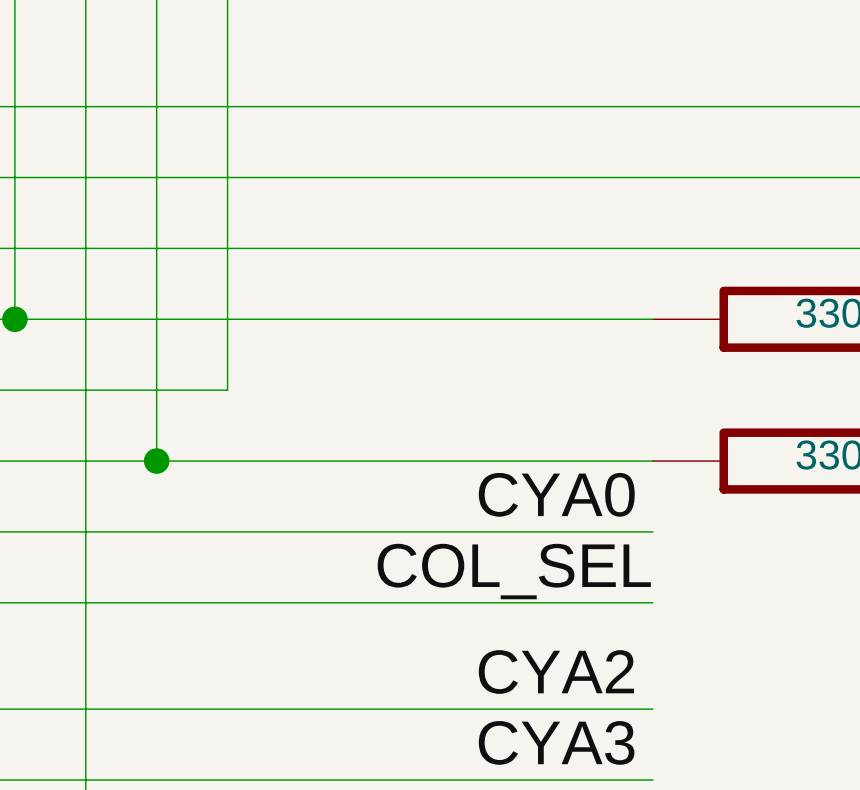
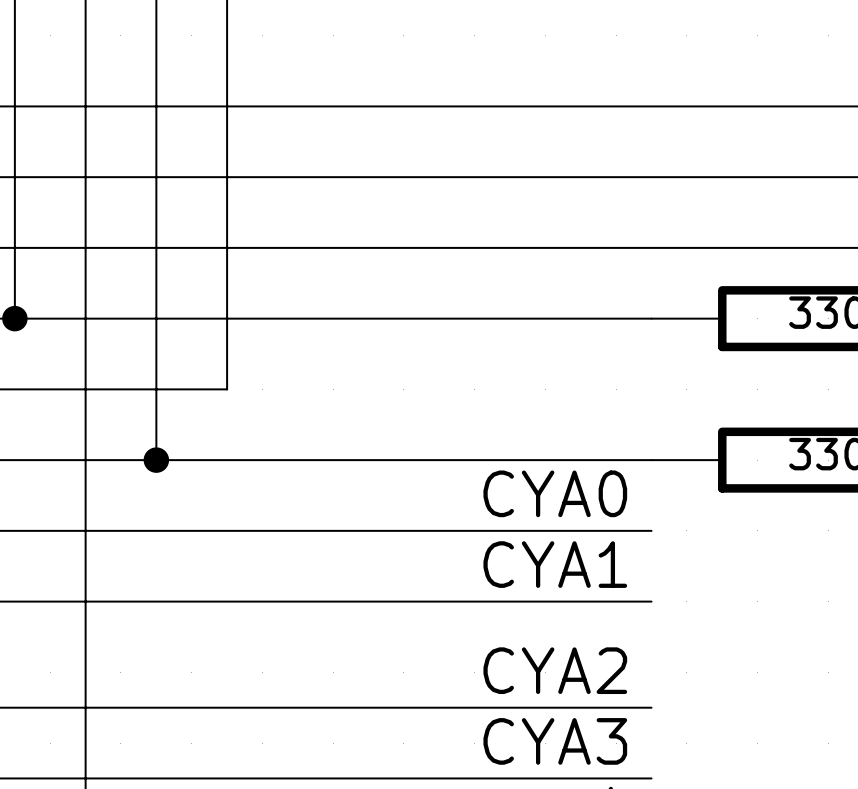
label: none -> CYA1 (555, 564)
label: COL_SEL (514, 571) -> none

